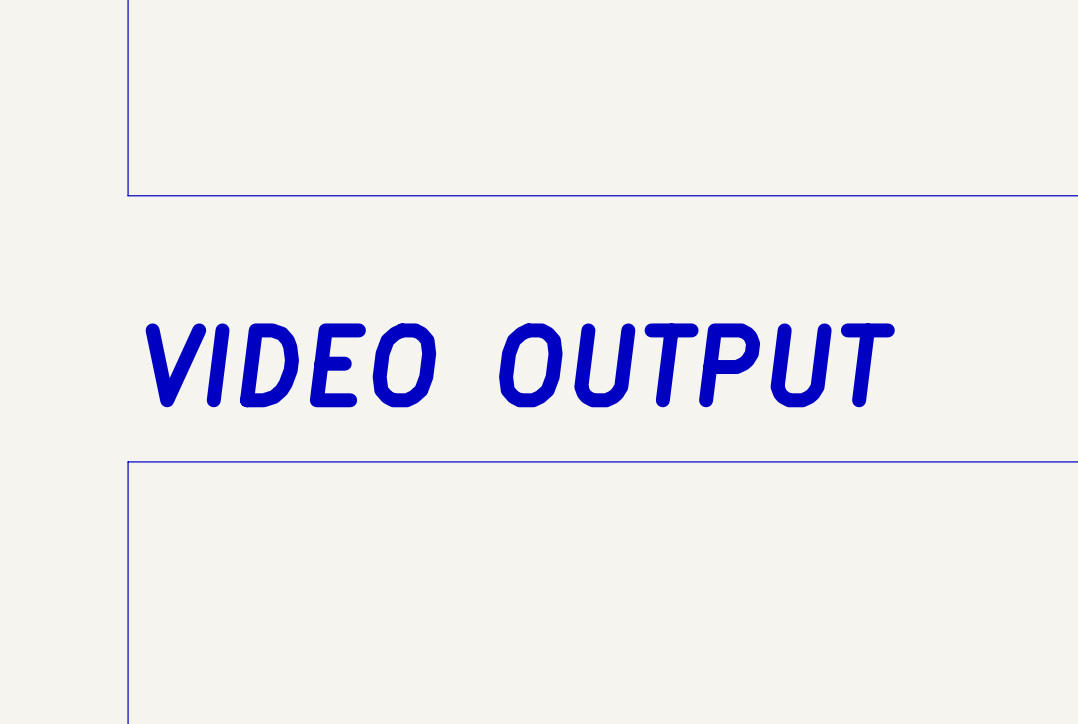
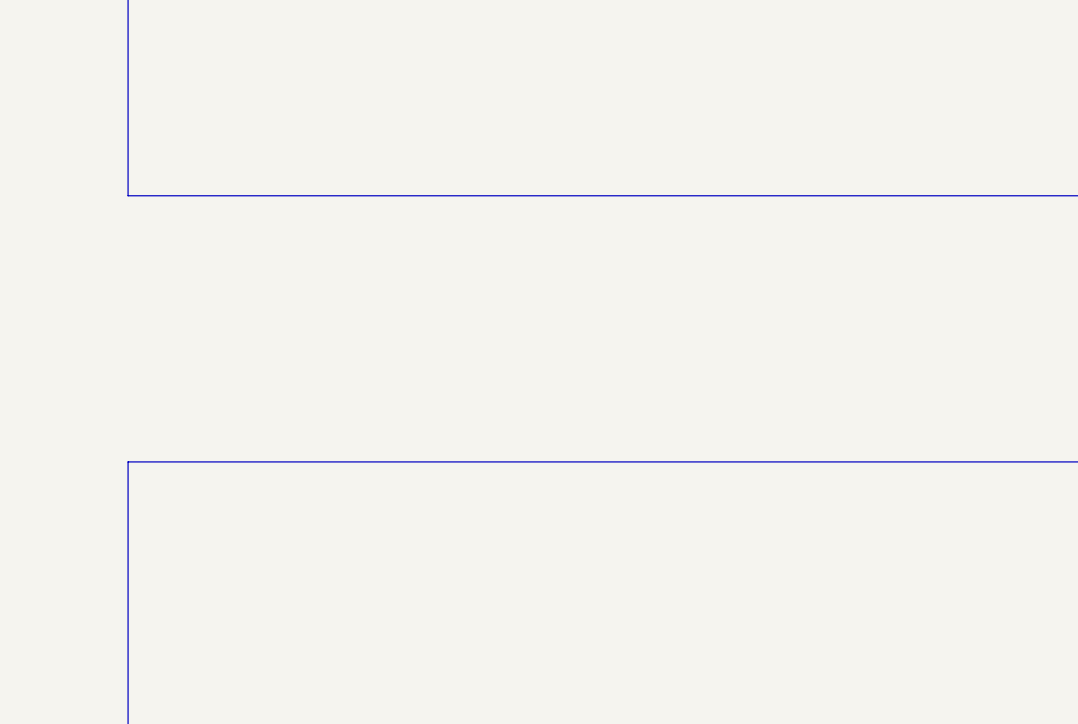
text: VIDEO OUTPUT (520, 365) -> none

